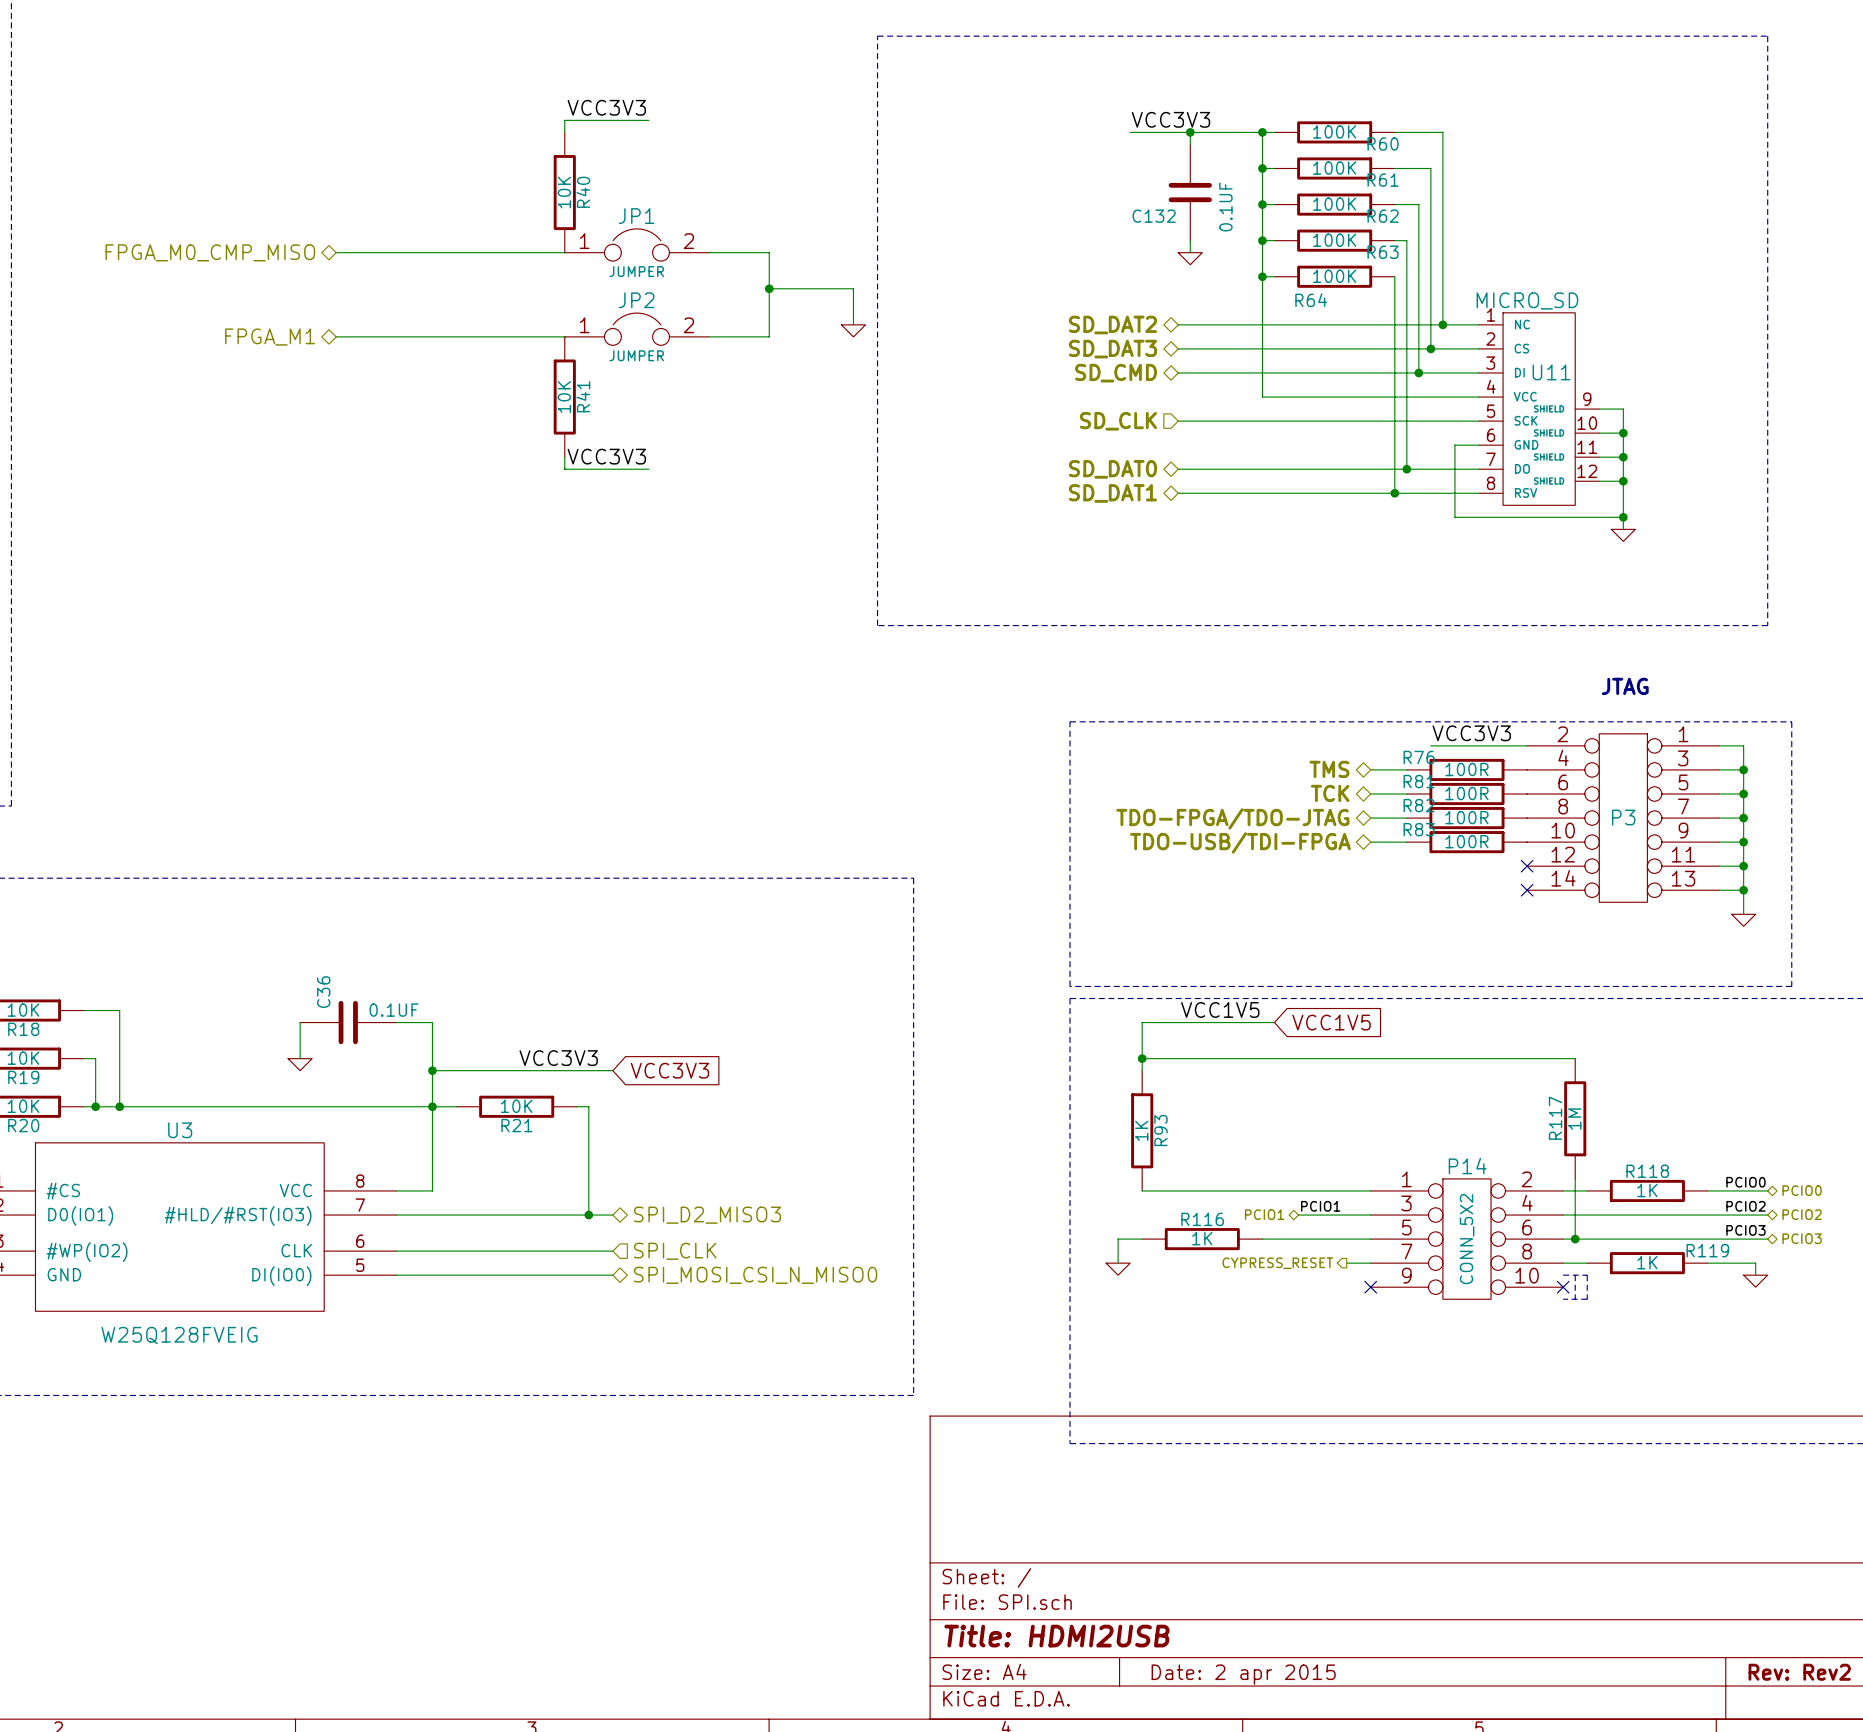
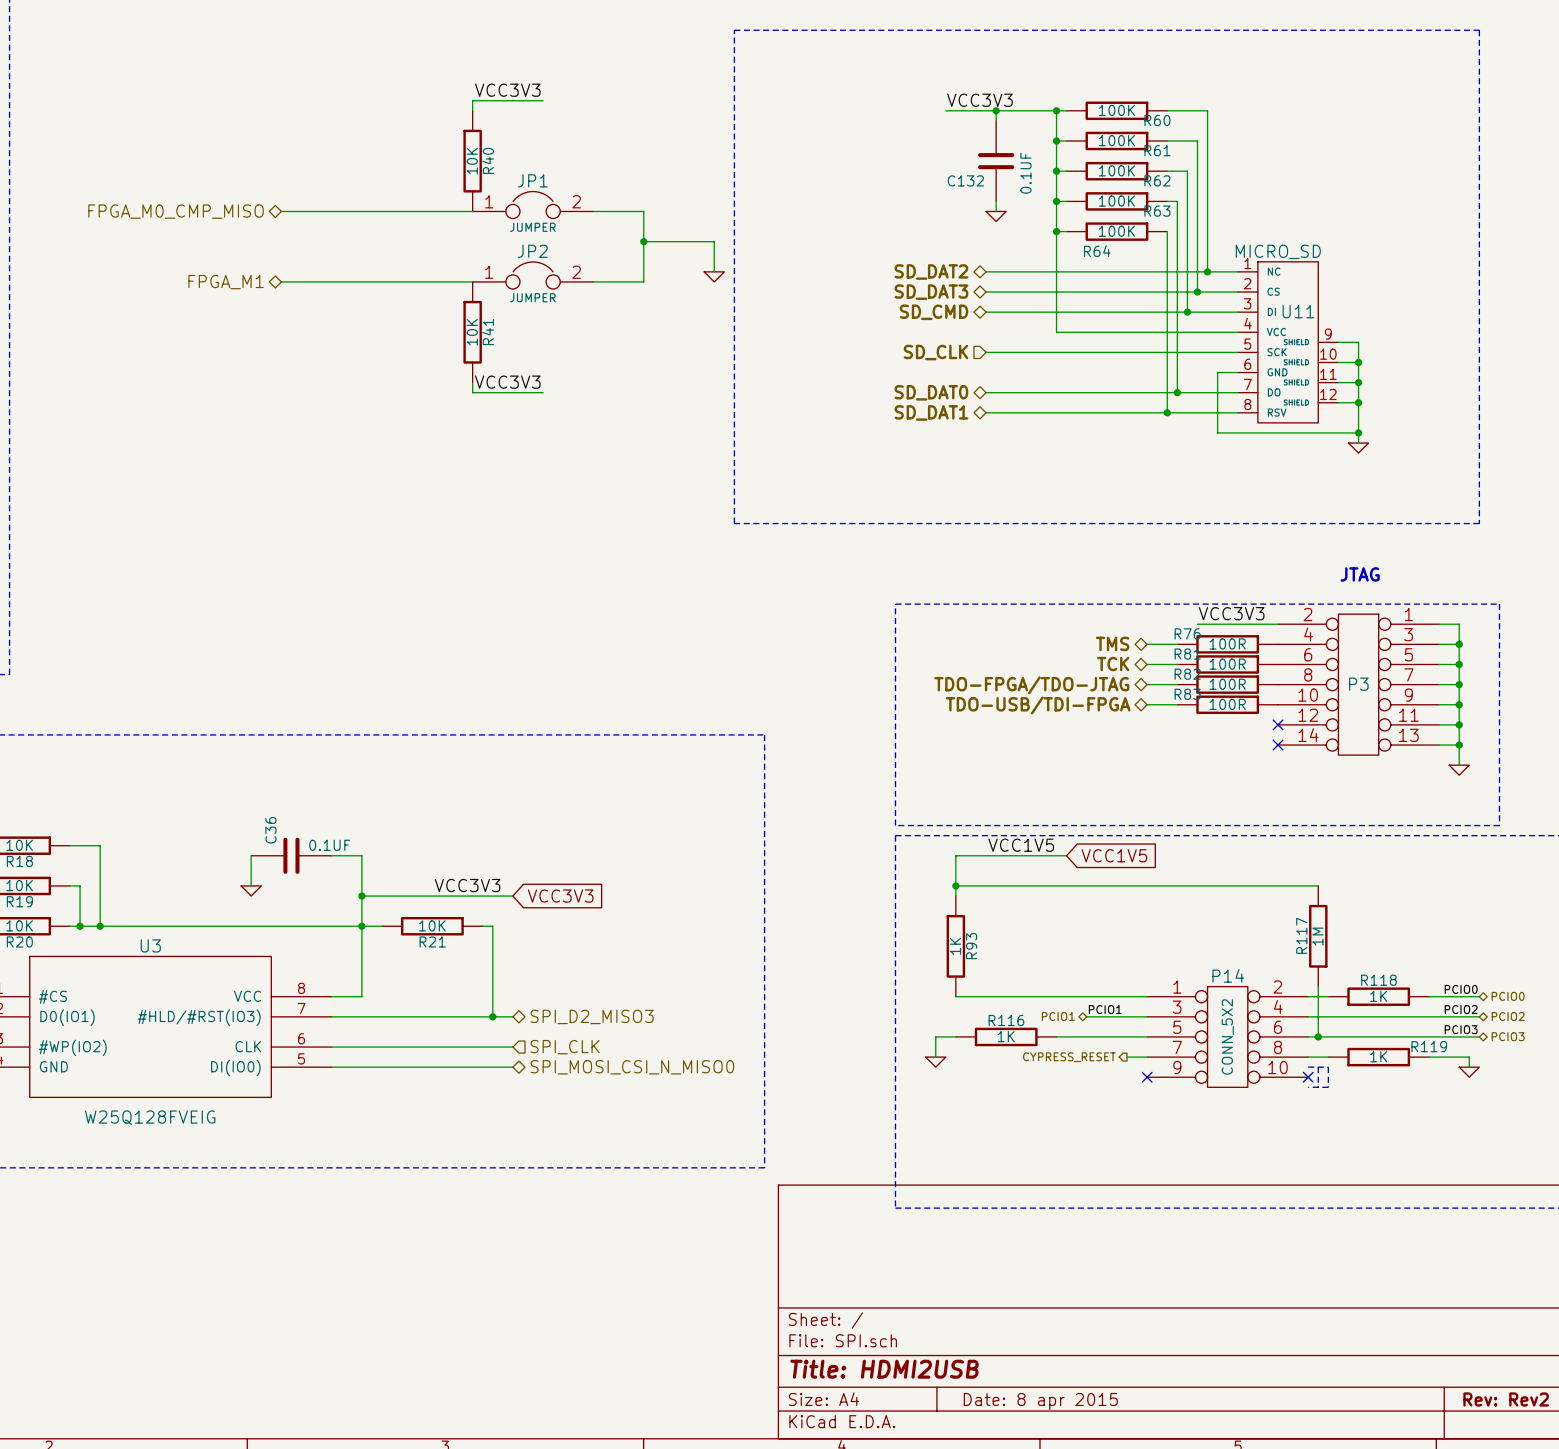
title block: Date: 2 apr 2015 (1243, 1674) -> Date: 8 apr 2015 (1040, 1401)

